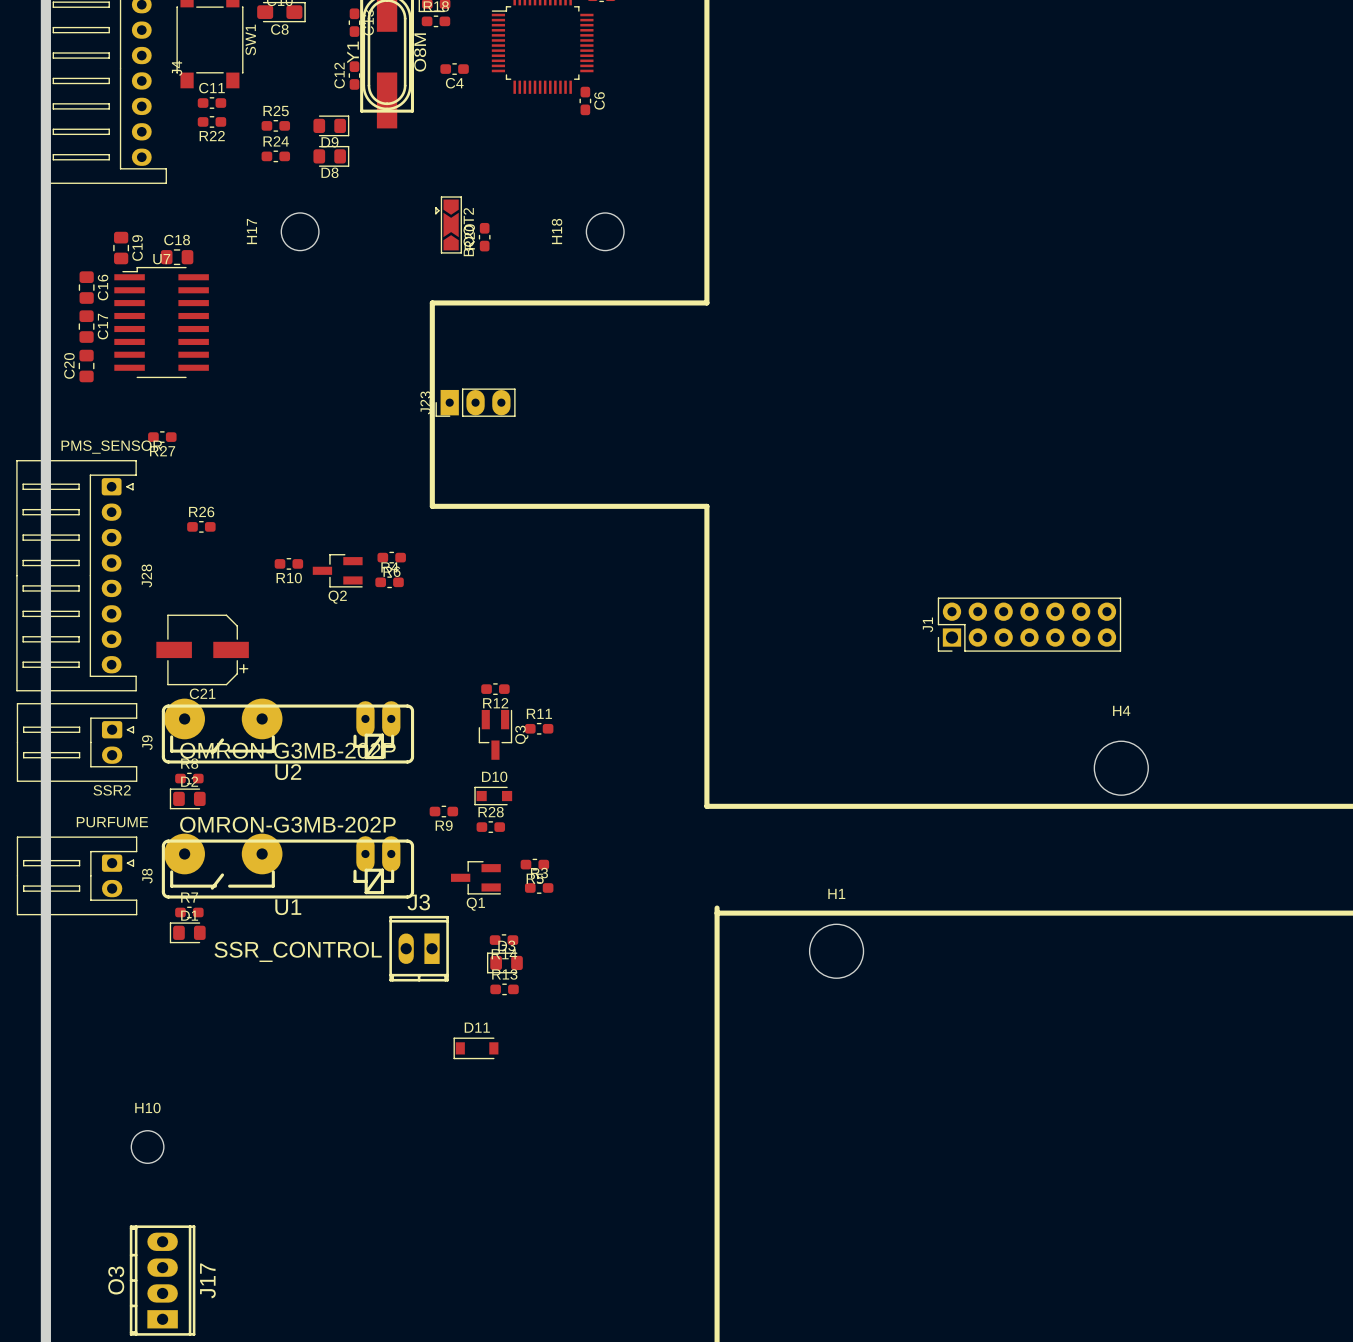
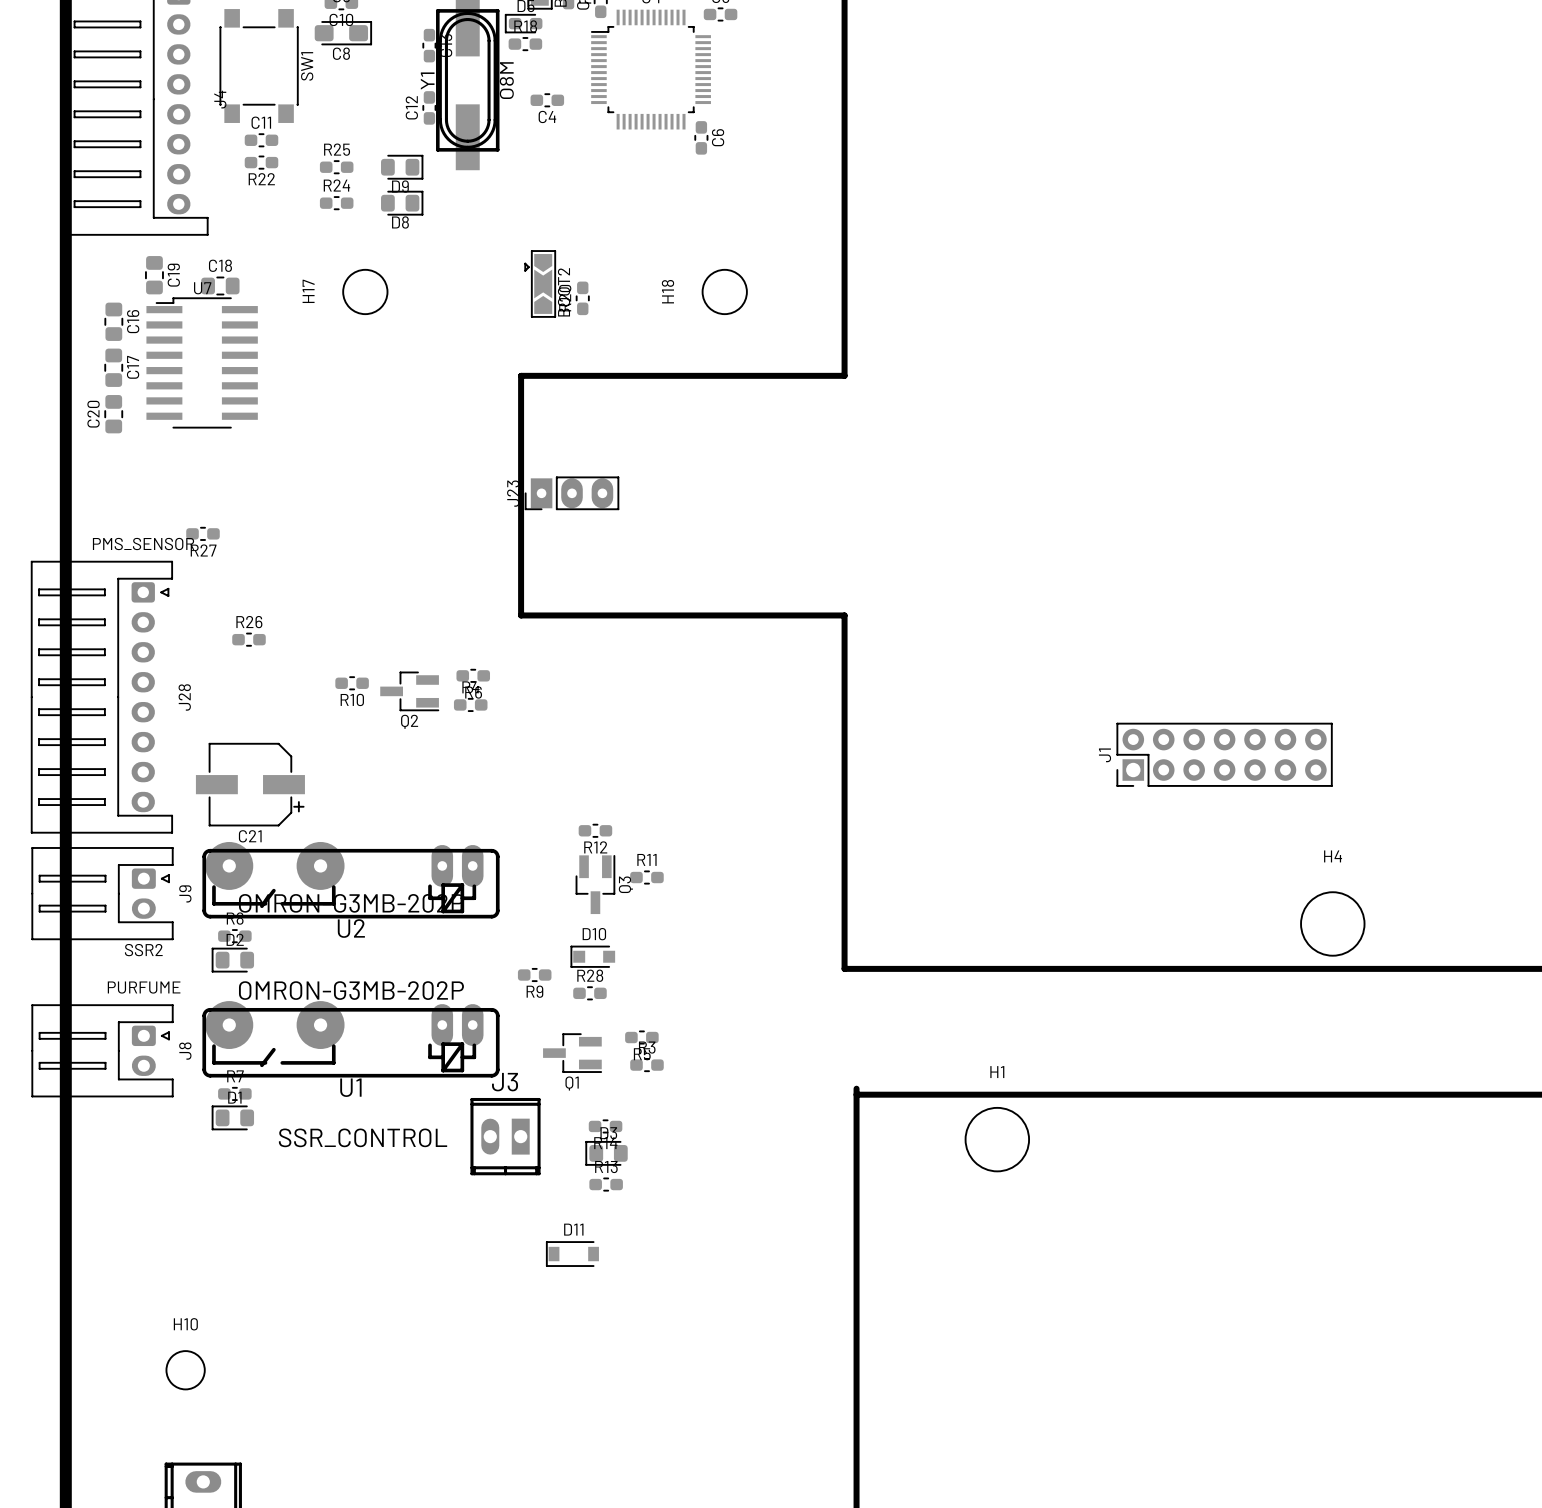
C19 position: (121, 248) -> (154, 275)
C18 position: (177, 257) -> (220, 285)
C16 position: (86, 287) -> (113, 321)
U7 position: (161, 322) -> (202, 362)
C17 position: (86, 326) -> (113, 367)
C20 position: (86, 366) -> (113, 414)

